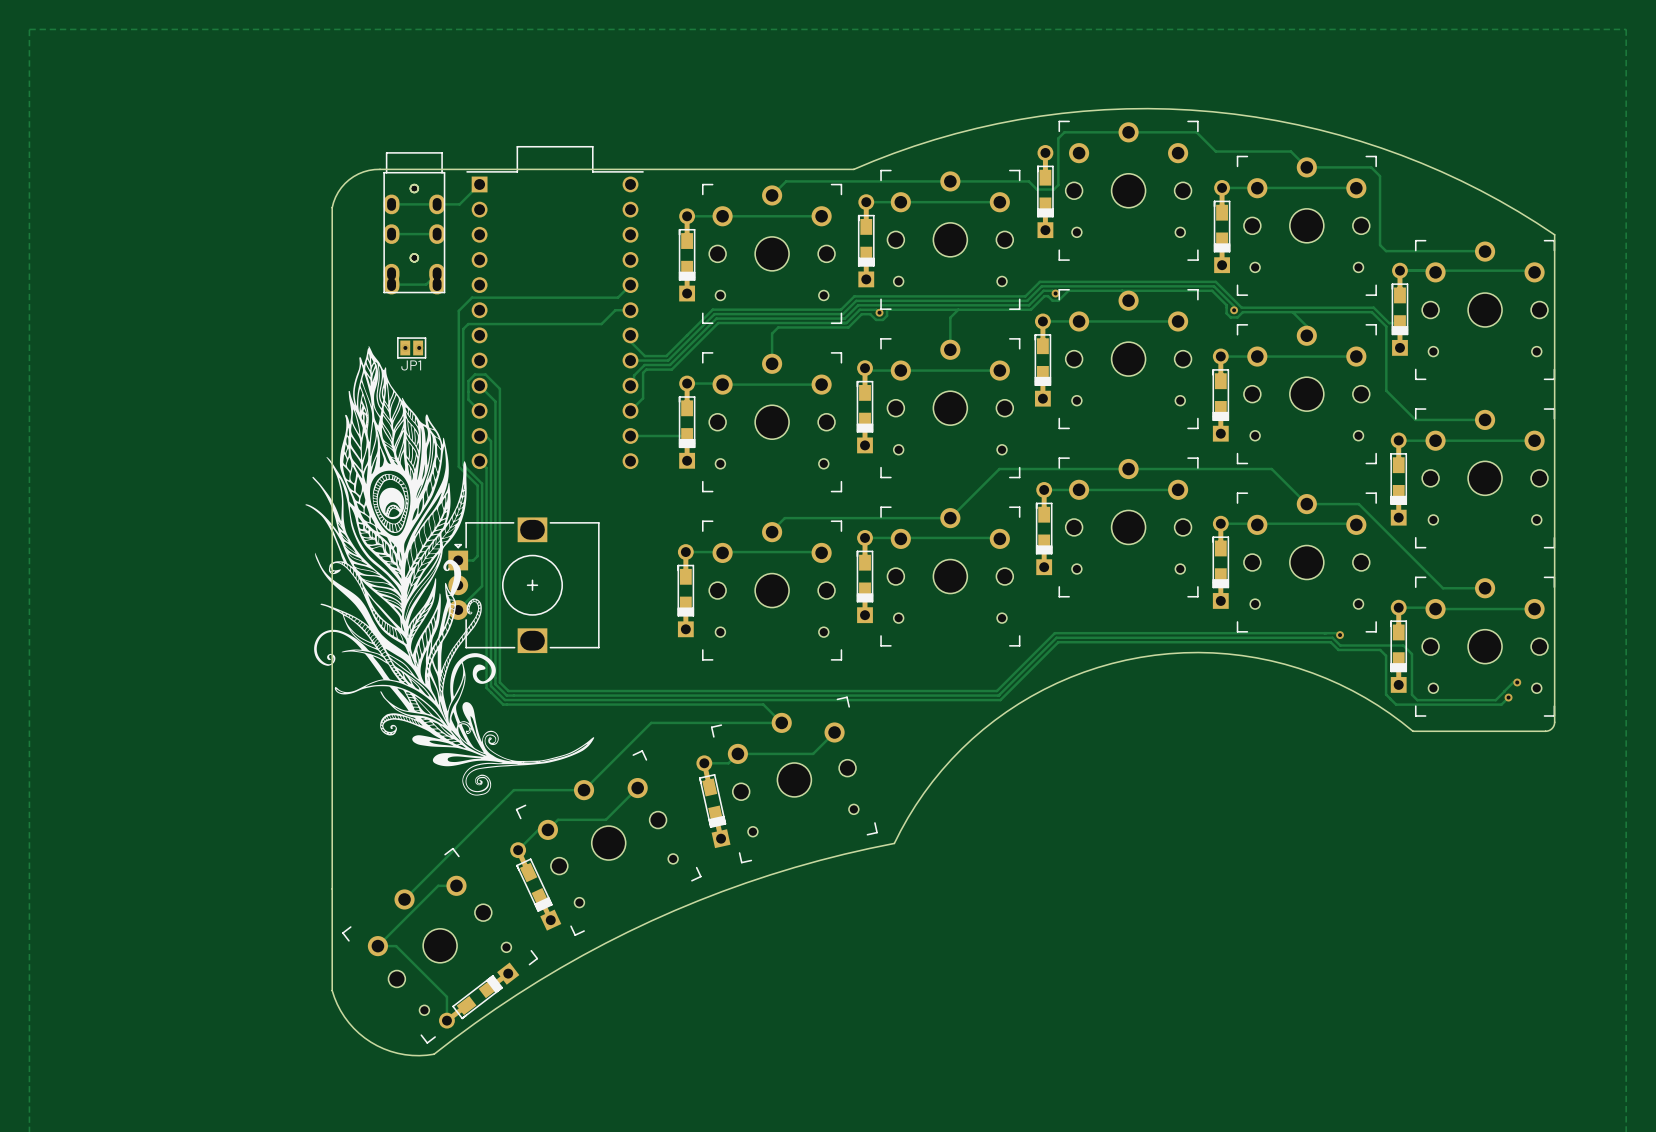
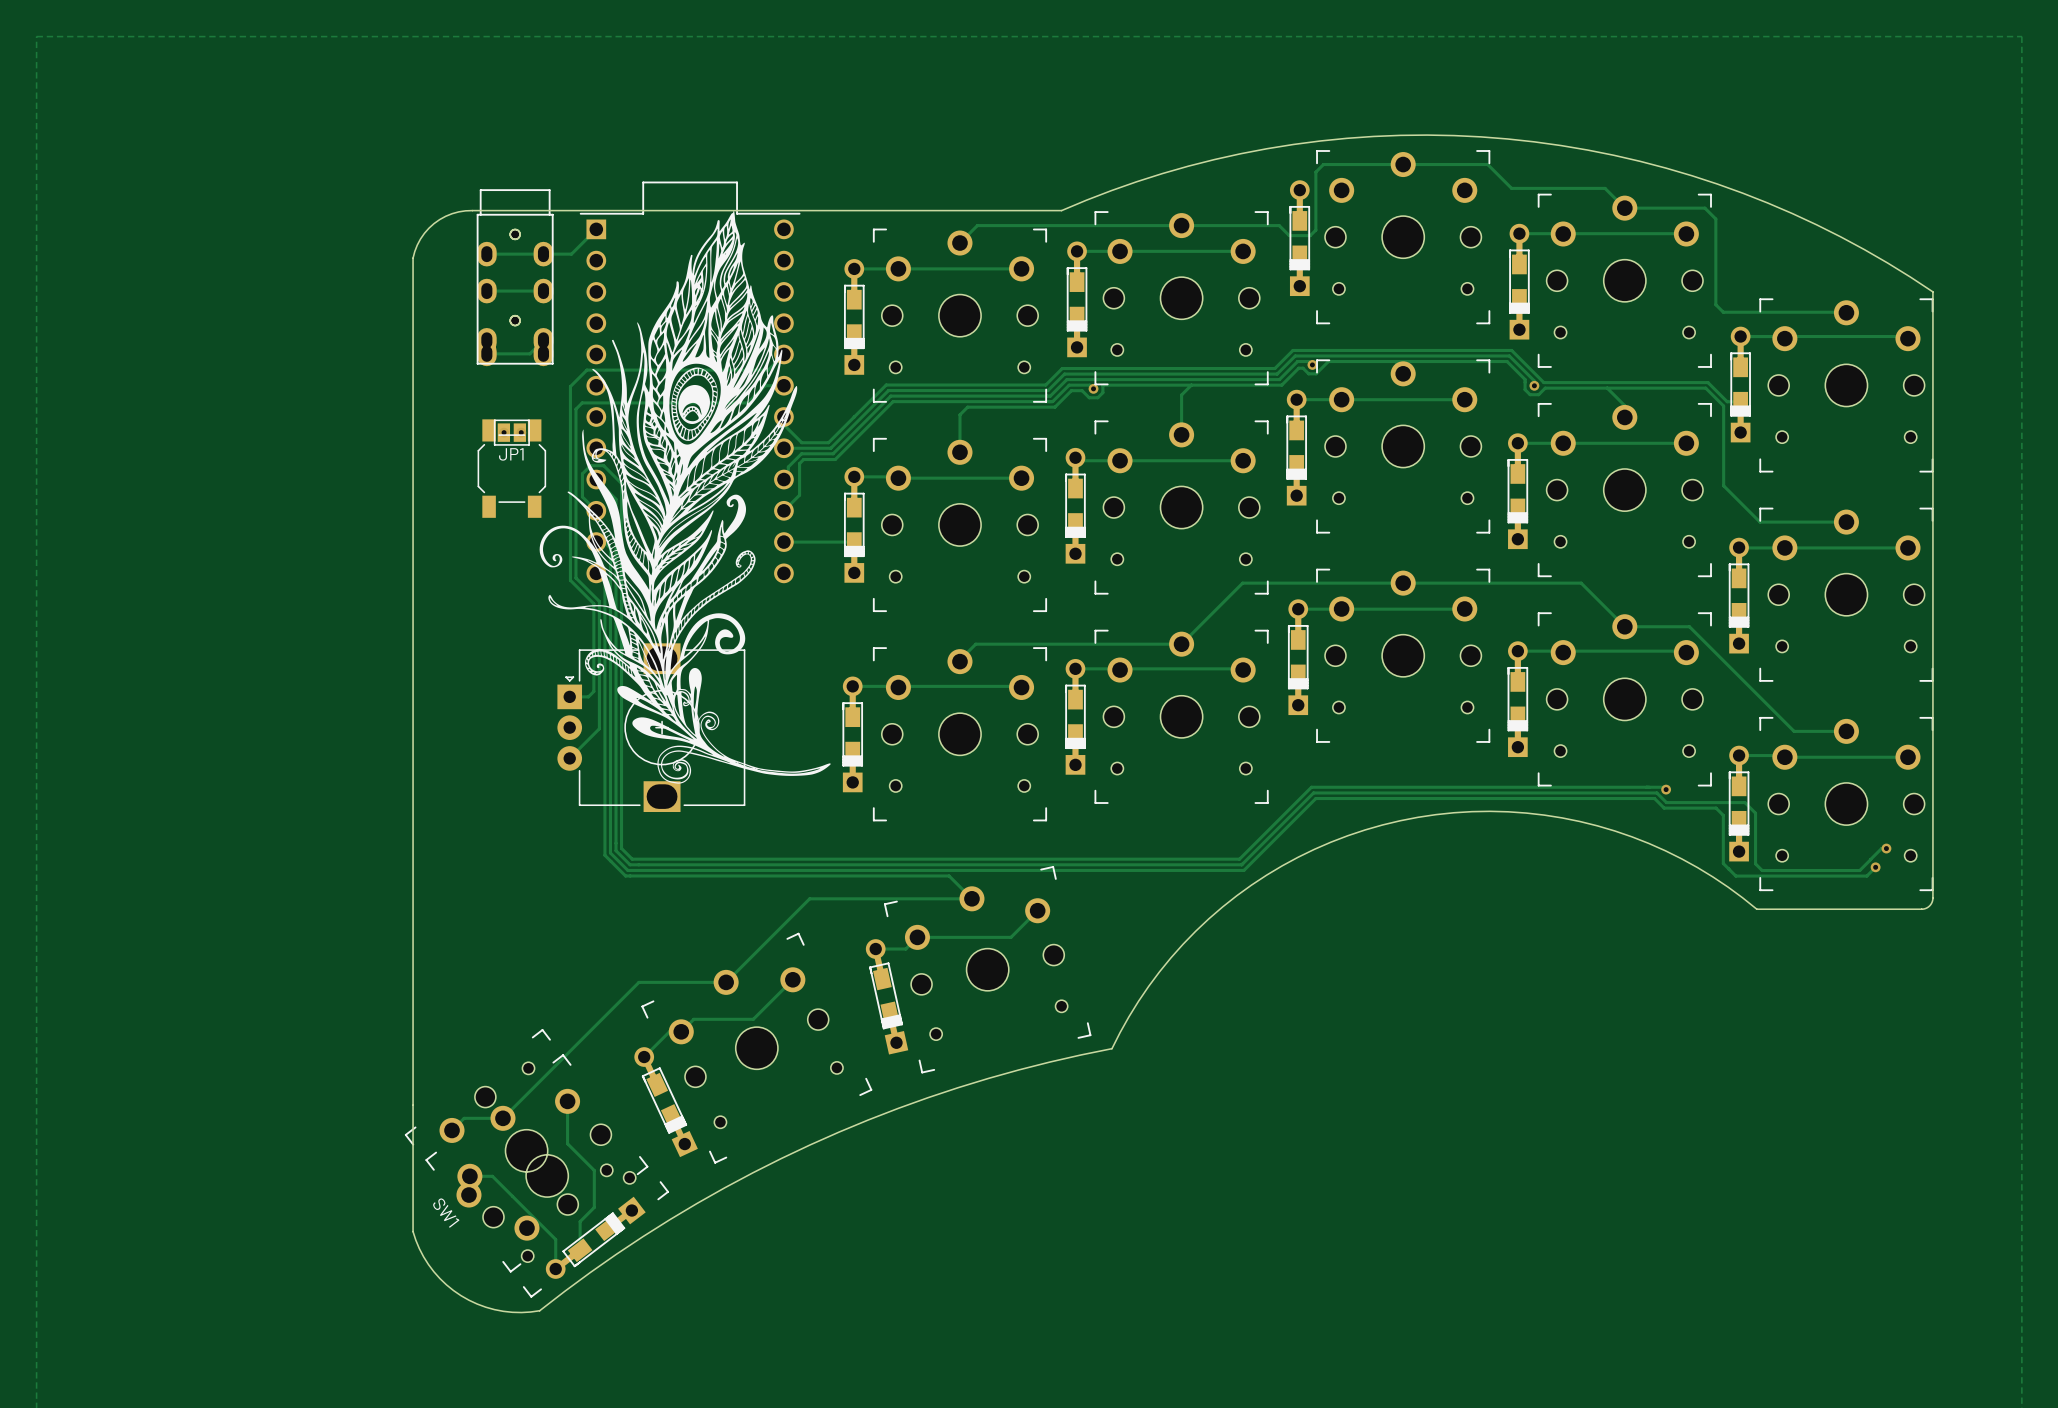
drawing: none -> [539, 210, 831, 784]
drawing: [305, 346, 595, 796] -> none
part: none -> (511, 468)
track: (456, 885) (438, 885) (377, 946) -> (567, 1101) (567, 1143) (594, 1170) (594, 1207) (580, 1221) (580, 1250)
track: none -> (502, 1118) (464, 1118) (452, 1130)
SW1: none -> (526, 1150)

